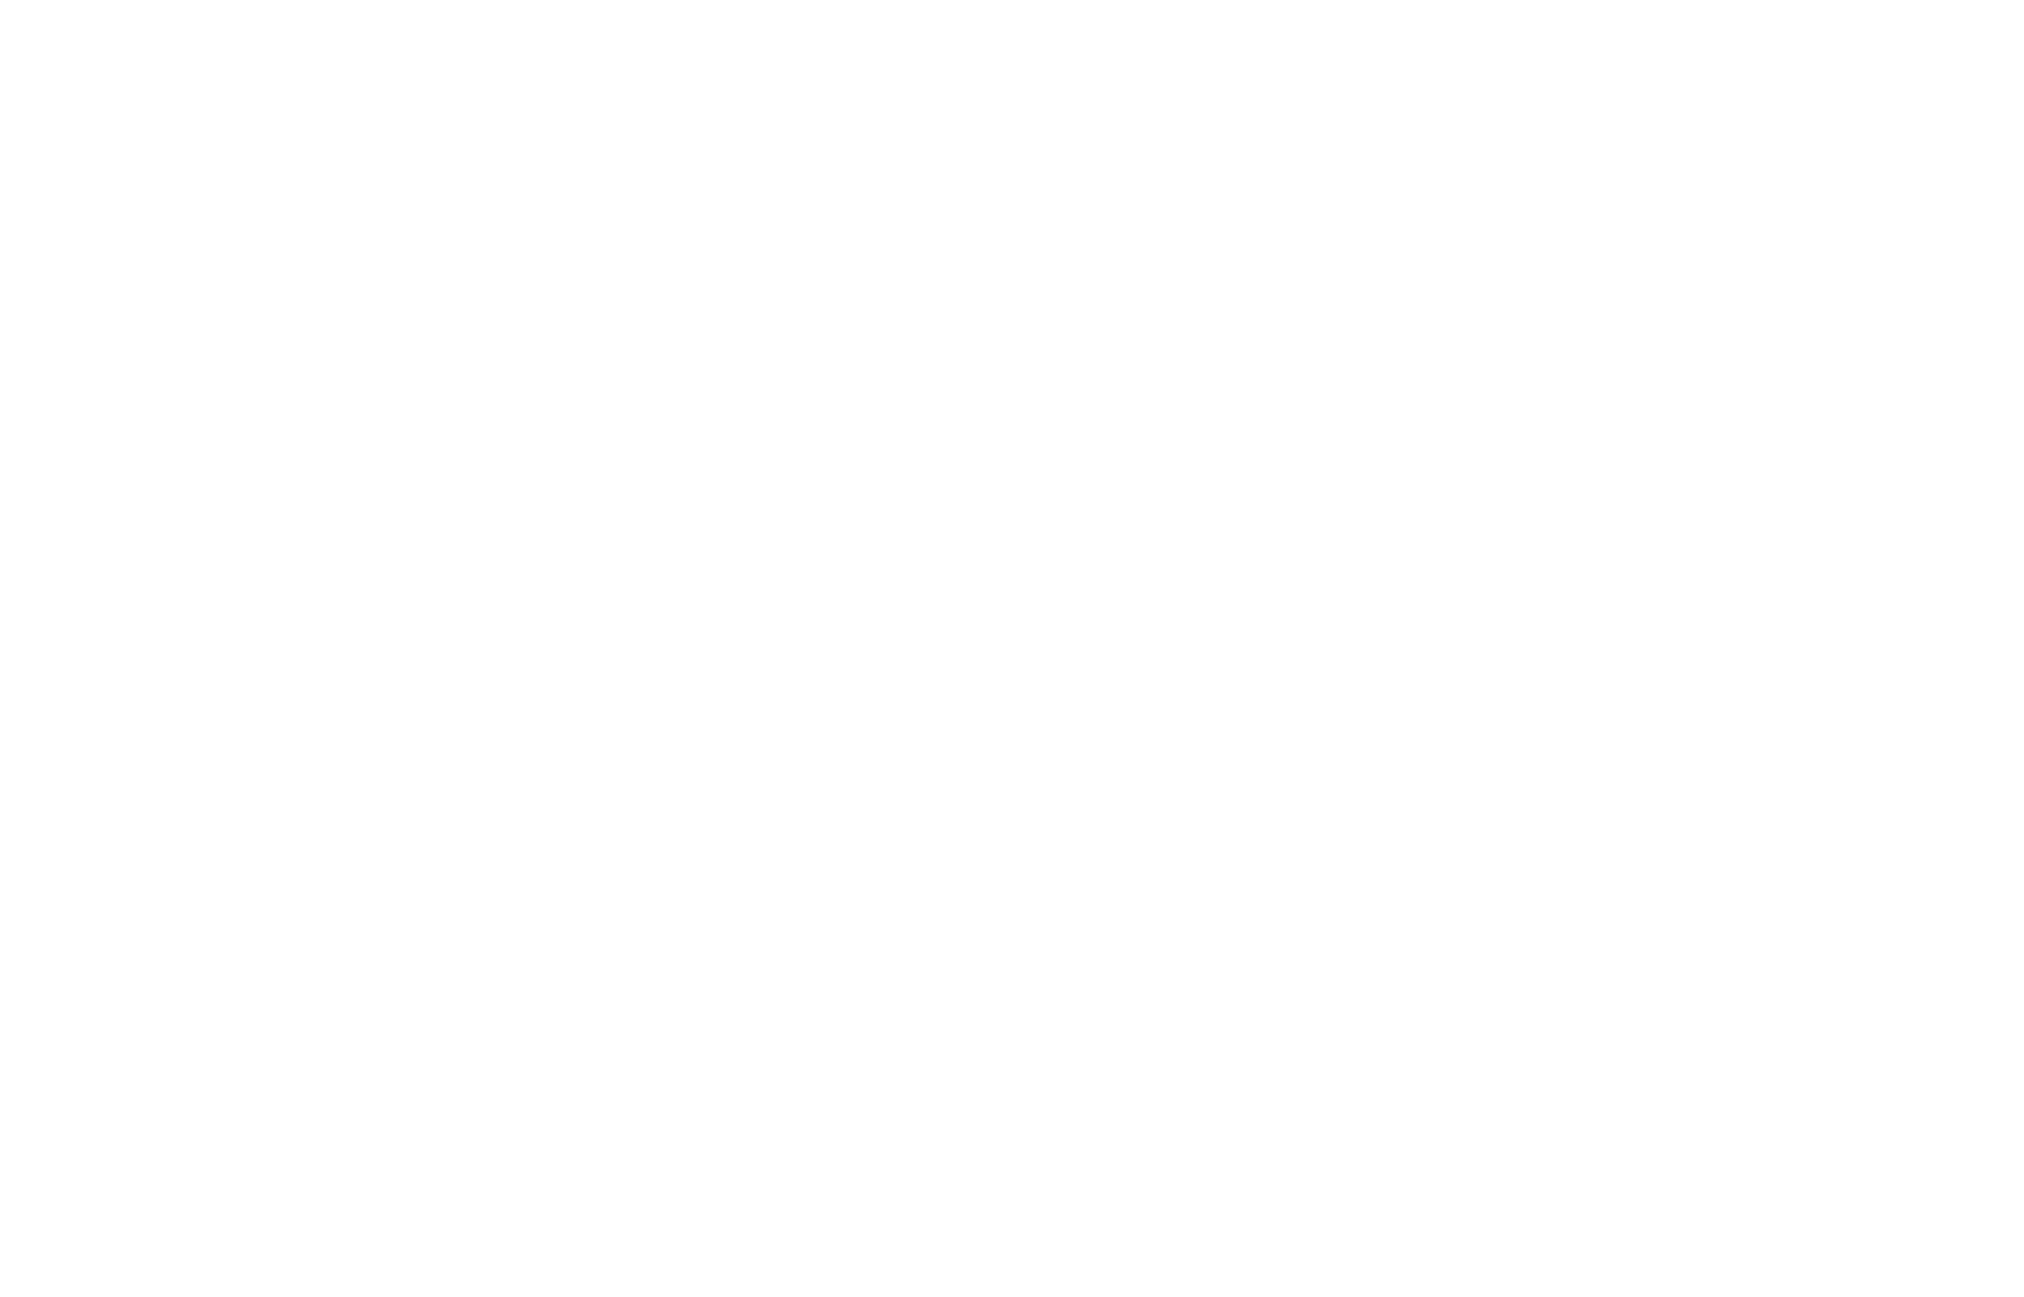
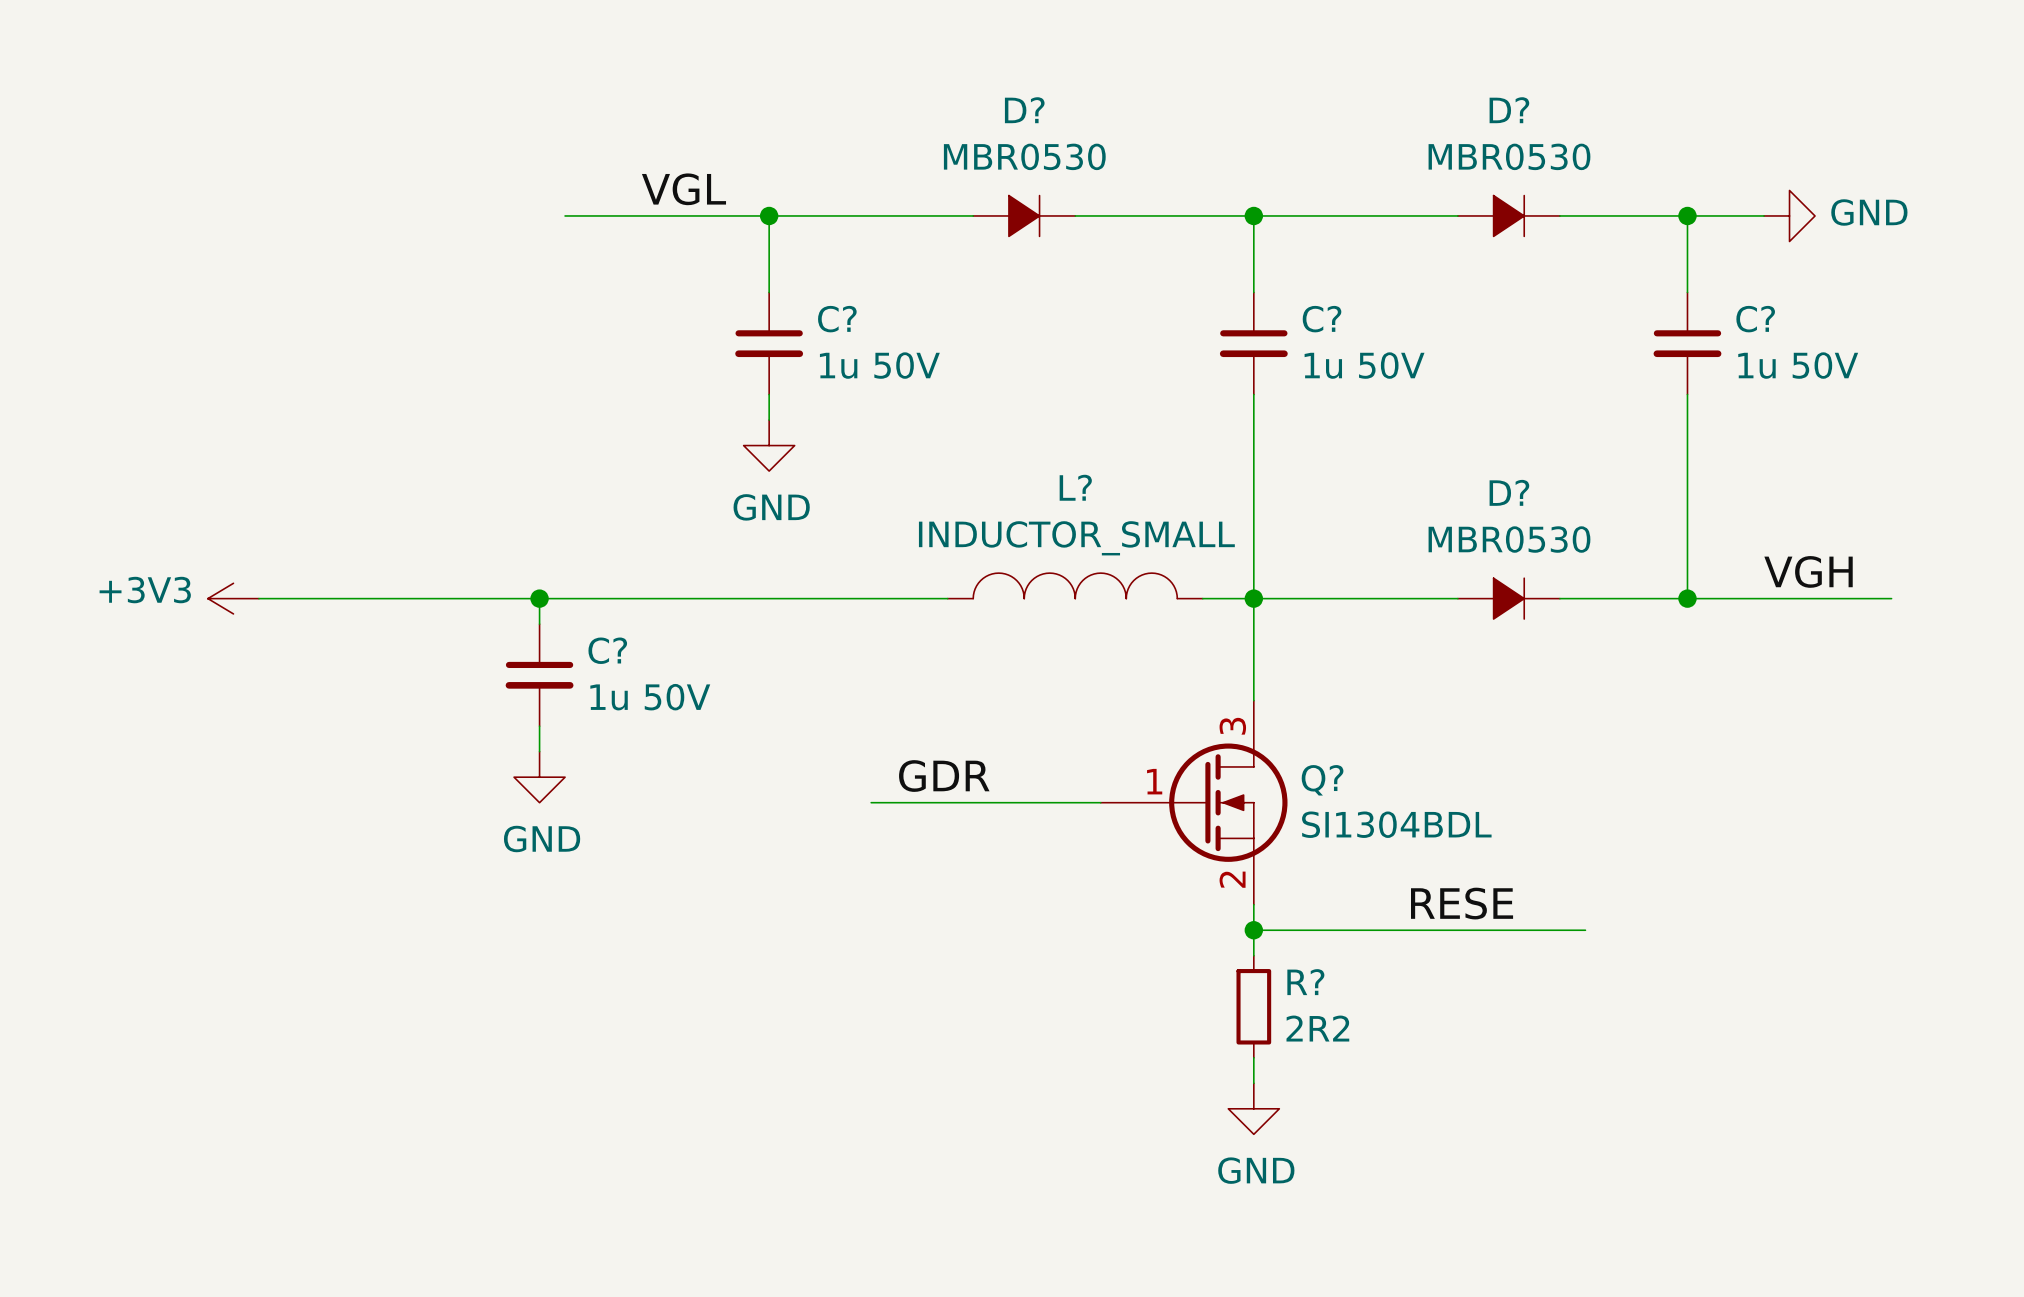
label: none -> VGL (683, 189)
wire: none -> (565, 215) (973, 215)
wire: none -> (769, 215) (769, 292)
junction: none -> (769, 215)
D?: none -> MBR0530 (1024, 215)
wire: none -> (1075, 215) (1457, 215)
wire: none -> (1253, 215) (1253, 292)
junction: none -> (1253, 215)
D?: none -> MBR0530 (1508, 215)
wire: none -> (1559, 215) (1764, 215)
wire: none -> (1687, 215) (1687, 292)
junction: none -> (1687, 215)
power symbol: none -> GND (1789, 215)
C?: none -> 1u 50V (769, 343)
C?: none -> 1u 50V (1253, 343)
C?: none -> 1u 50V (1687, 343)
wire: none -> (769, 394) (769, 420)
wire: none -> (1253, 394) (1253, 700)
wire: none -> (1687, 394) (1687, 598)
power symbol: none -> GND (769, 445)
label: none -> VGH (1808, 571)
L?: none -> INDUCTOR_SMALL (1075, 585)
power symbol: none -> +3V3 (233, 598)
wire: none -> (258, 598) (947, 598)
wire: none -> (539, 598) (539, 624)
junction: none -> (539, 598)
wire: none -> (1202, 598) (1457, 598)
junction: none -> (1253, 598)
D?: none -> MBR0530 (1508, 598)
wire: none -> (1559, 598) (1891, 598)
junction: none -> (1687, 598)
C?: none -> 1u 50V (539, 675)
wire: none -> (539, 726) (539, 751)
label: none -> GDR (944, 776)
power symbol: none -> GND (539, 777)
wire: none -> (871, 802) (1100, 802)
Q?: none -> SI1304BDL (1194, 802)
label: none -> RESE (1462, 903)
wire: none -> (1253, 904) (1253, 955)
wire: none -> (1253, 930) (1585, 930)
junction: none -> (1253, 930)
R?: none -> 2R2 (1253, 1006)
wire: none -> (1253, 1057) (1253, 1083)
power symbol: none -> GND (1253, 1108)

